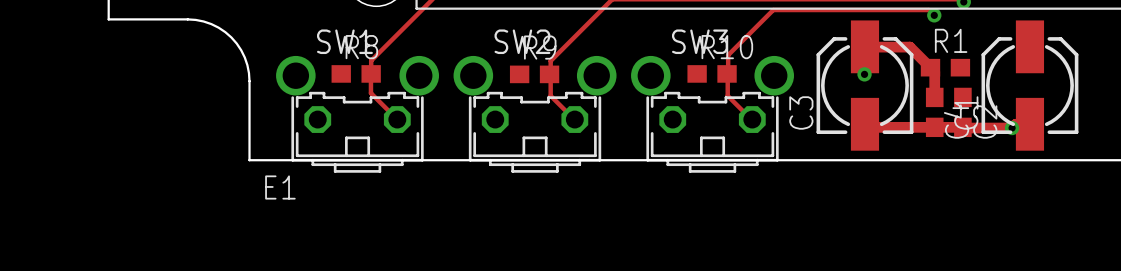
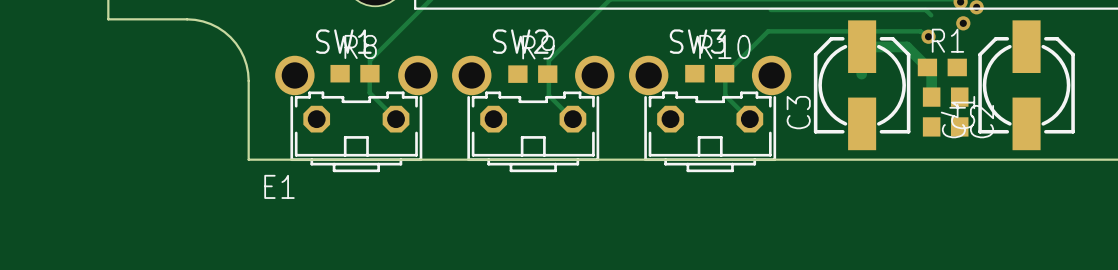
via: none -> (976, 7)
track: (773, 10) (728, 55) (728, 73) -> (928, 36) (920, 31) (768, 31) (725, 73)
via: (934, 15) -> none
via: none -> (963, 23)
via: none -> (928, 36)
via: (864, 74) -> none
track: (864, 124) (868, 127) (963, 128) (1012, 128) (1015, 124) (1029, 124) -> none
via: (1012, 128) -> none

